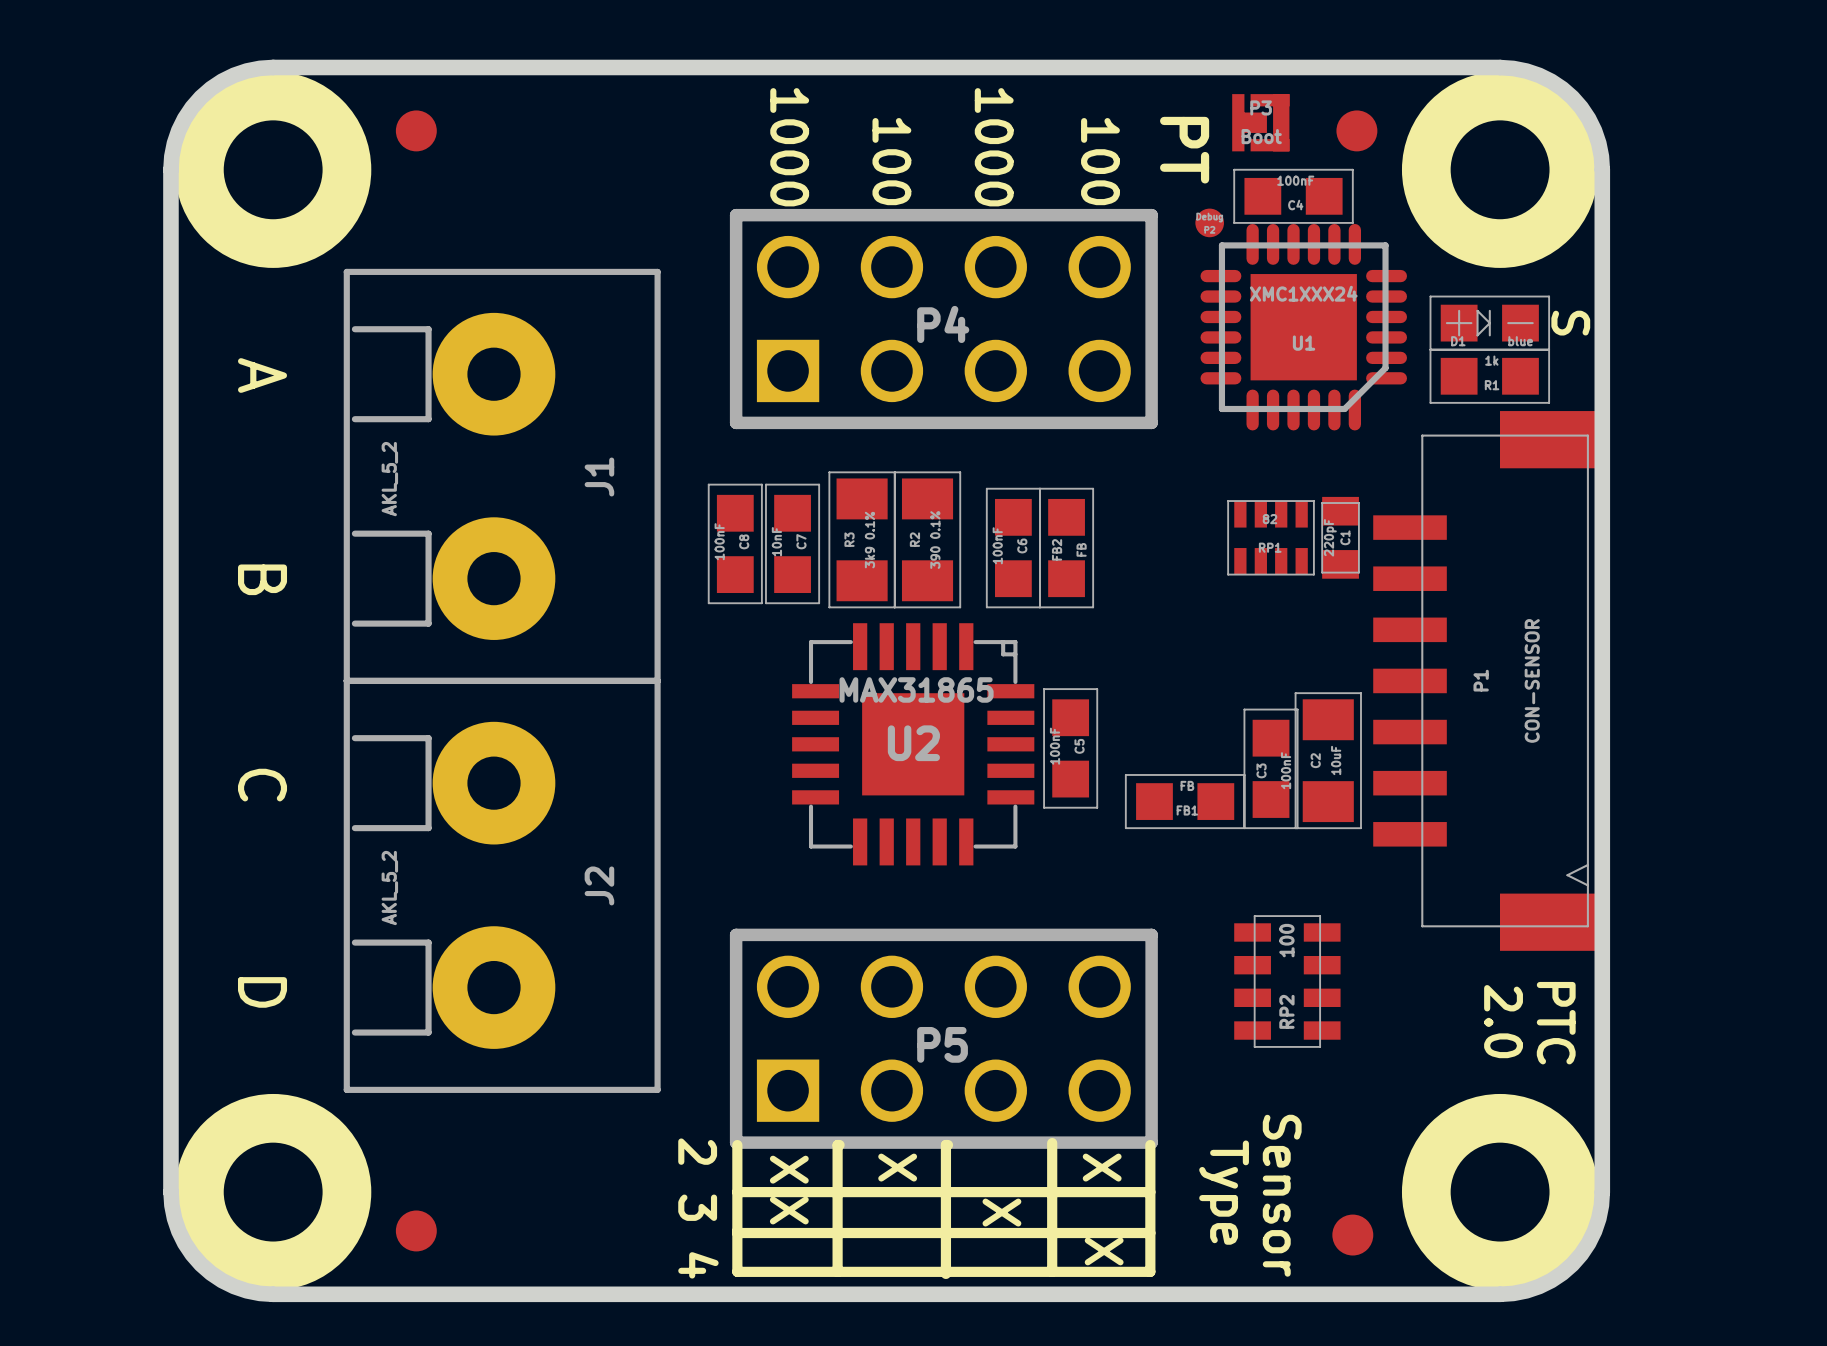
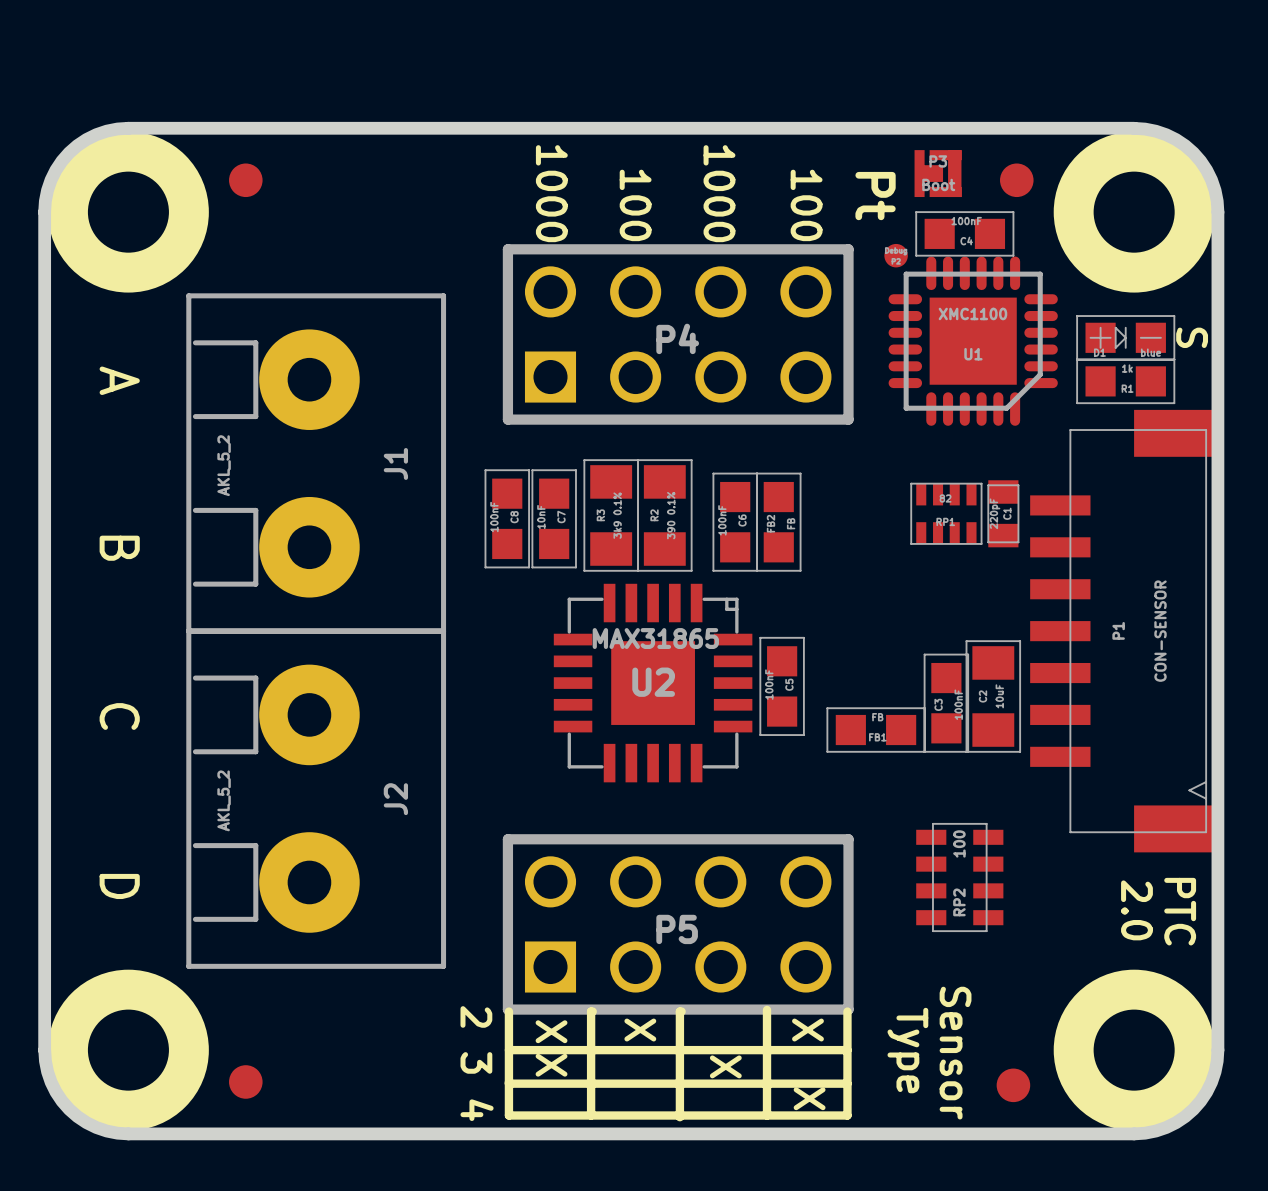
text: PT (1184, 150) -> Pt (875, 196)
U1 value: XMC1XXX24 (1303, 293) -> XMC1100 (972, 313)

